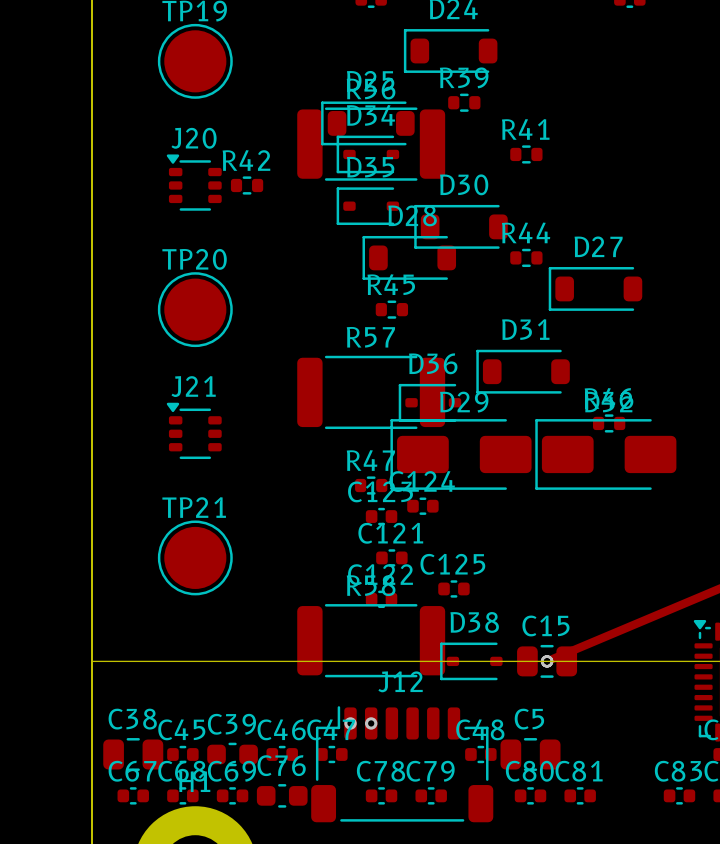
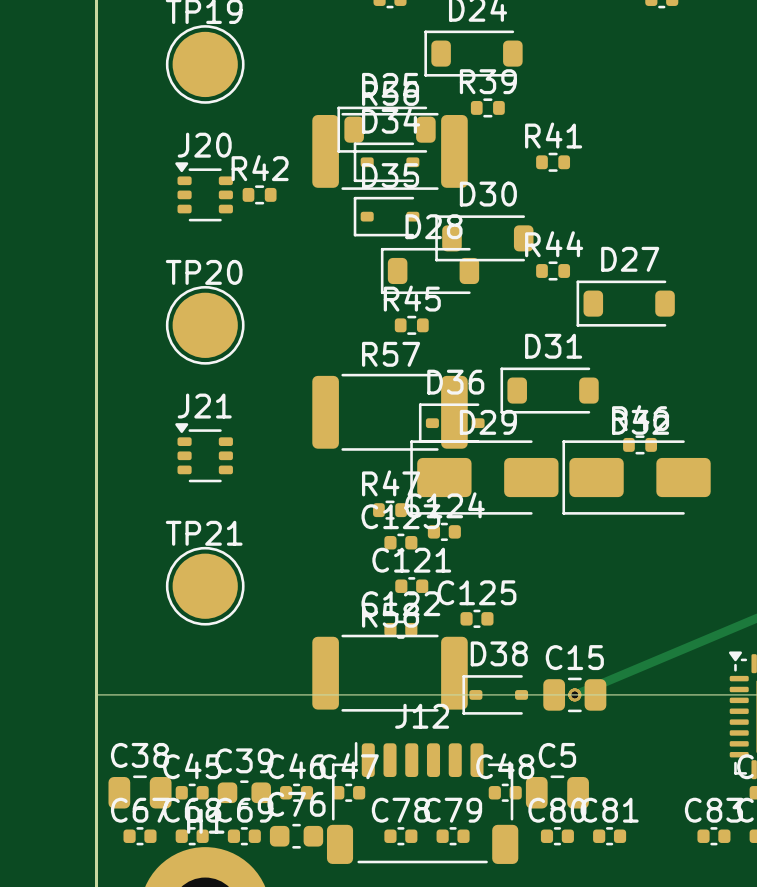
via: (350, 723) -> none
via: (371, 723) -> none

